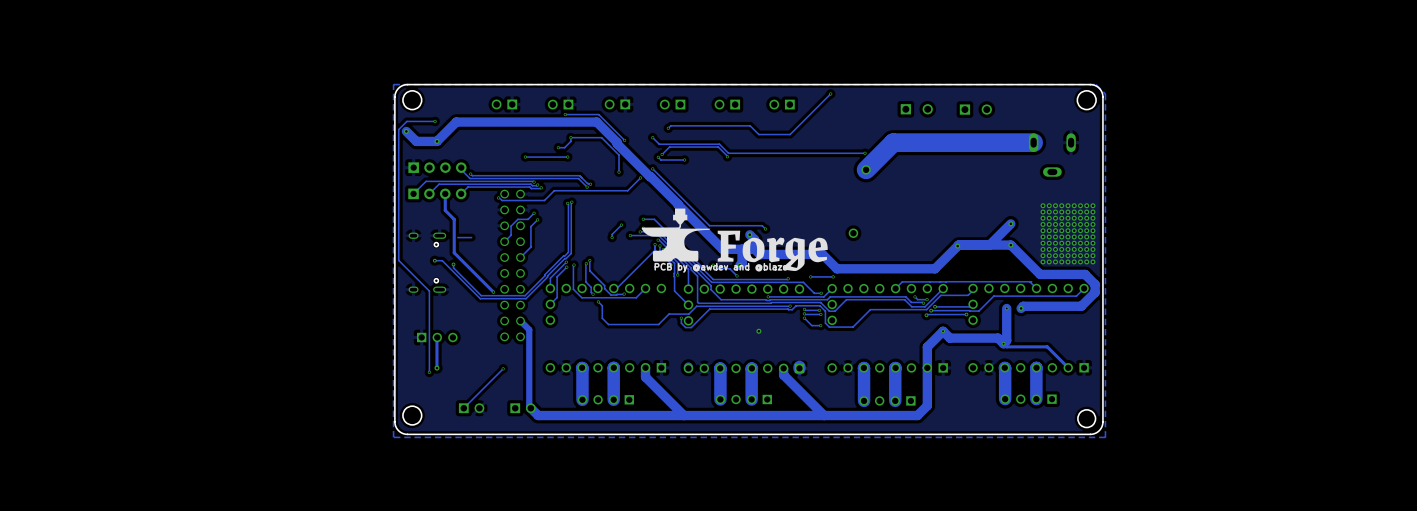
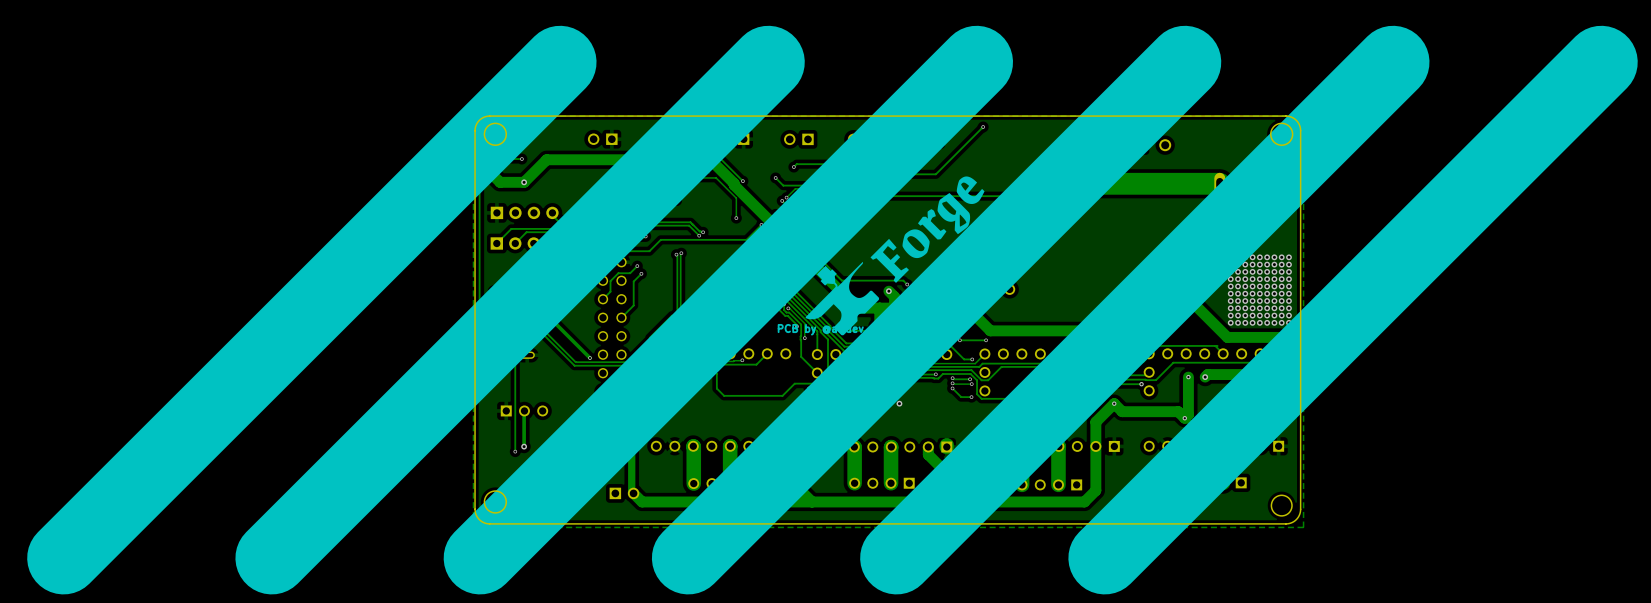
line: none -> (560, 62) (63, 558)
line: none -> (768, 62) (271, 558)
line: none -> (976, 62) (480, 558)
line: none -> (1184, 62) (688, 558)
line: none -> (1393, 62) (896, 558)
line: none -> (1601, 62) (1104, 558)
drawing: none -> [805, 176, 985, 336]
drawing: [641, 208, 828, 271] -> none

